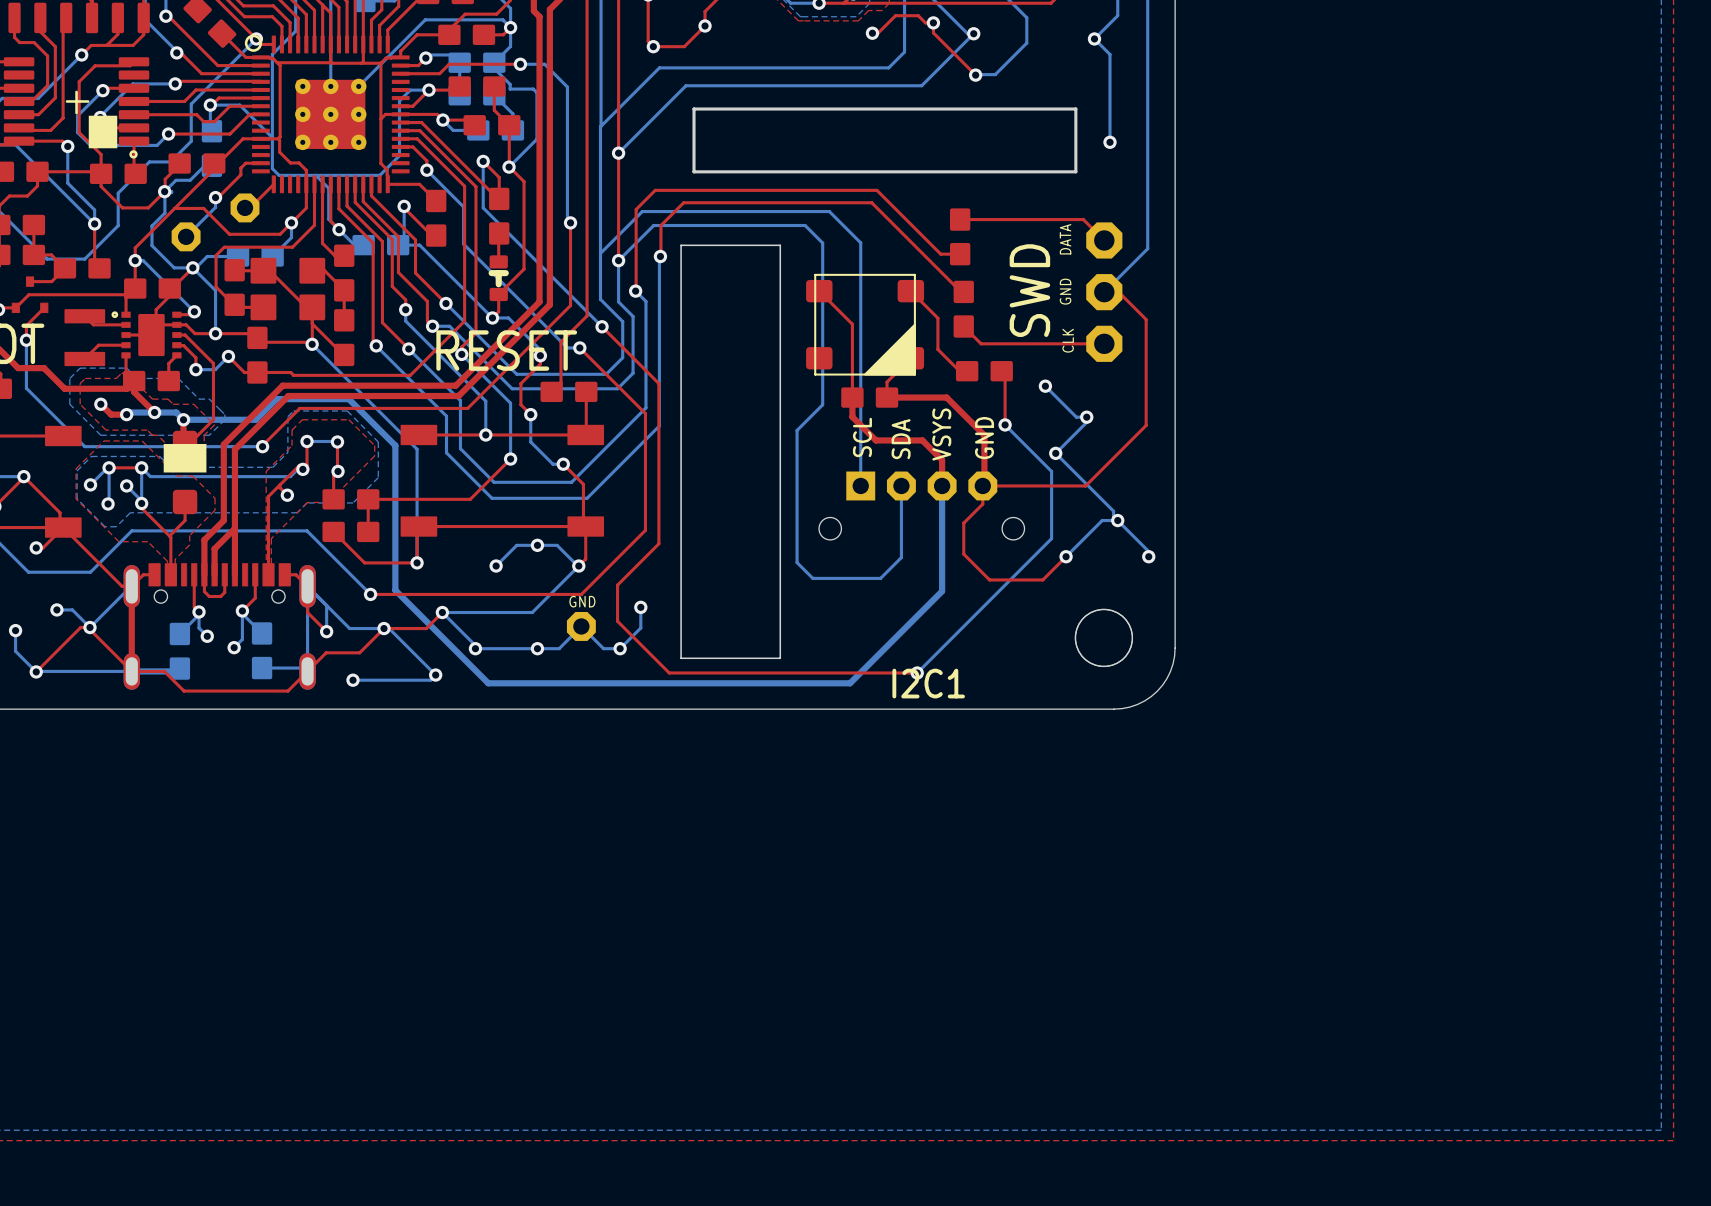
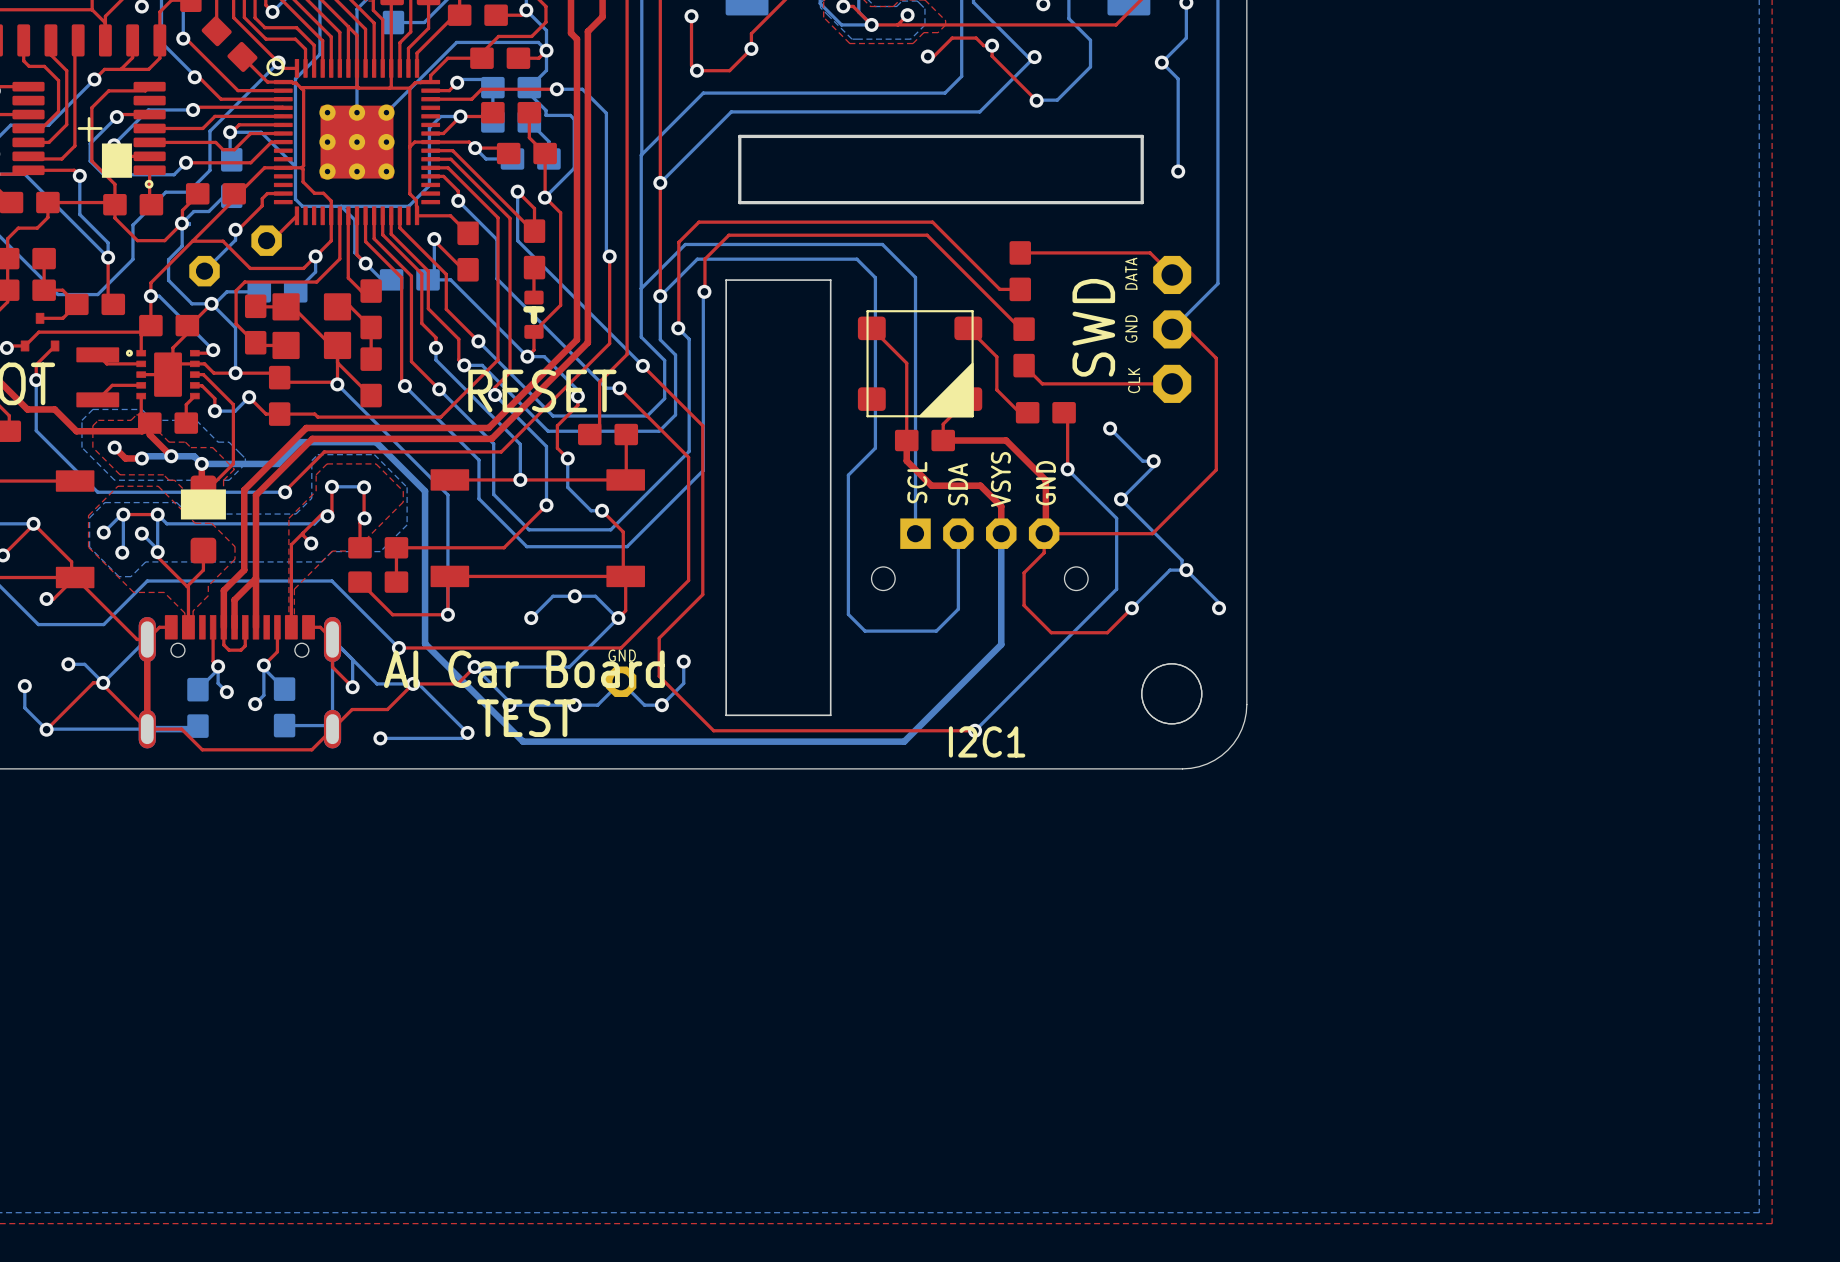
text: none -> AI Car Board (524, 669)
text: none -> TEST (526, 718)

